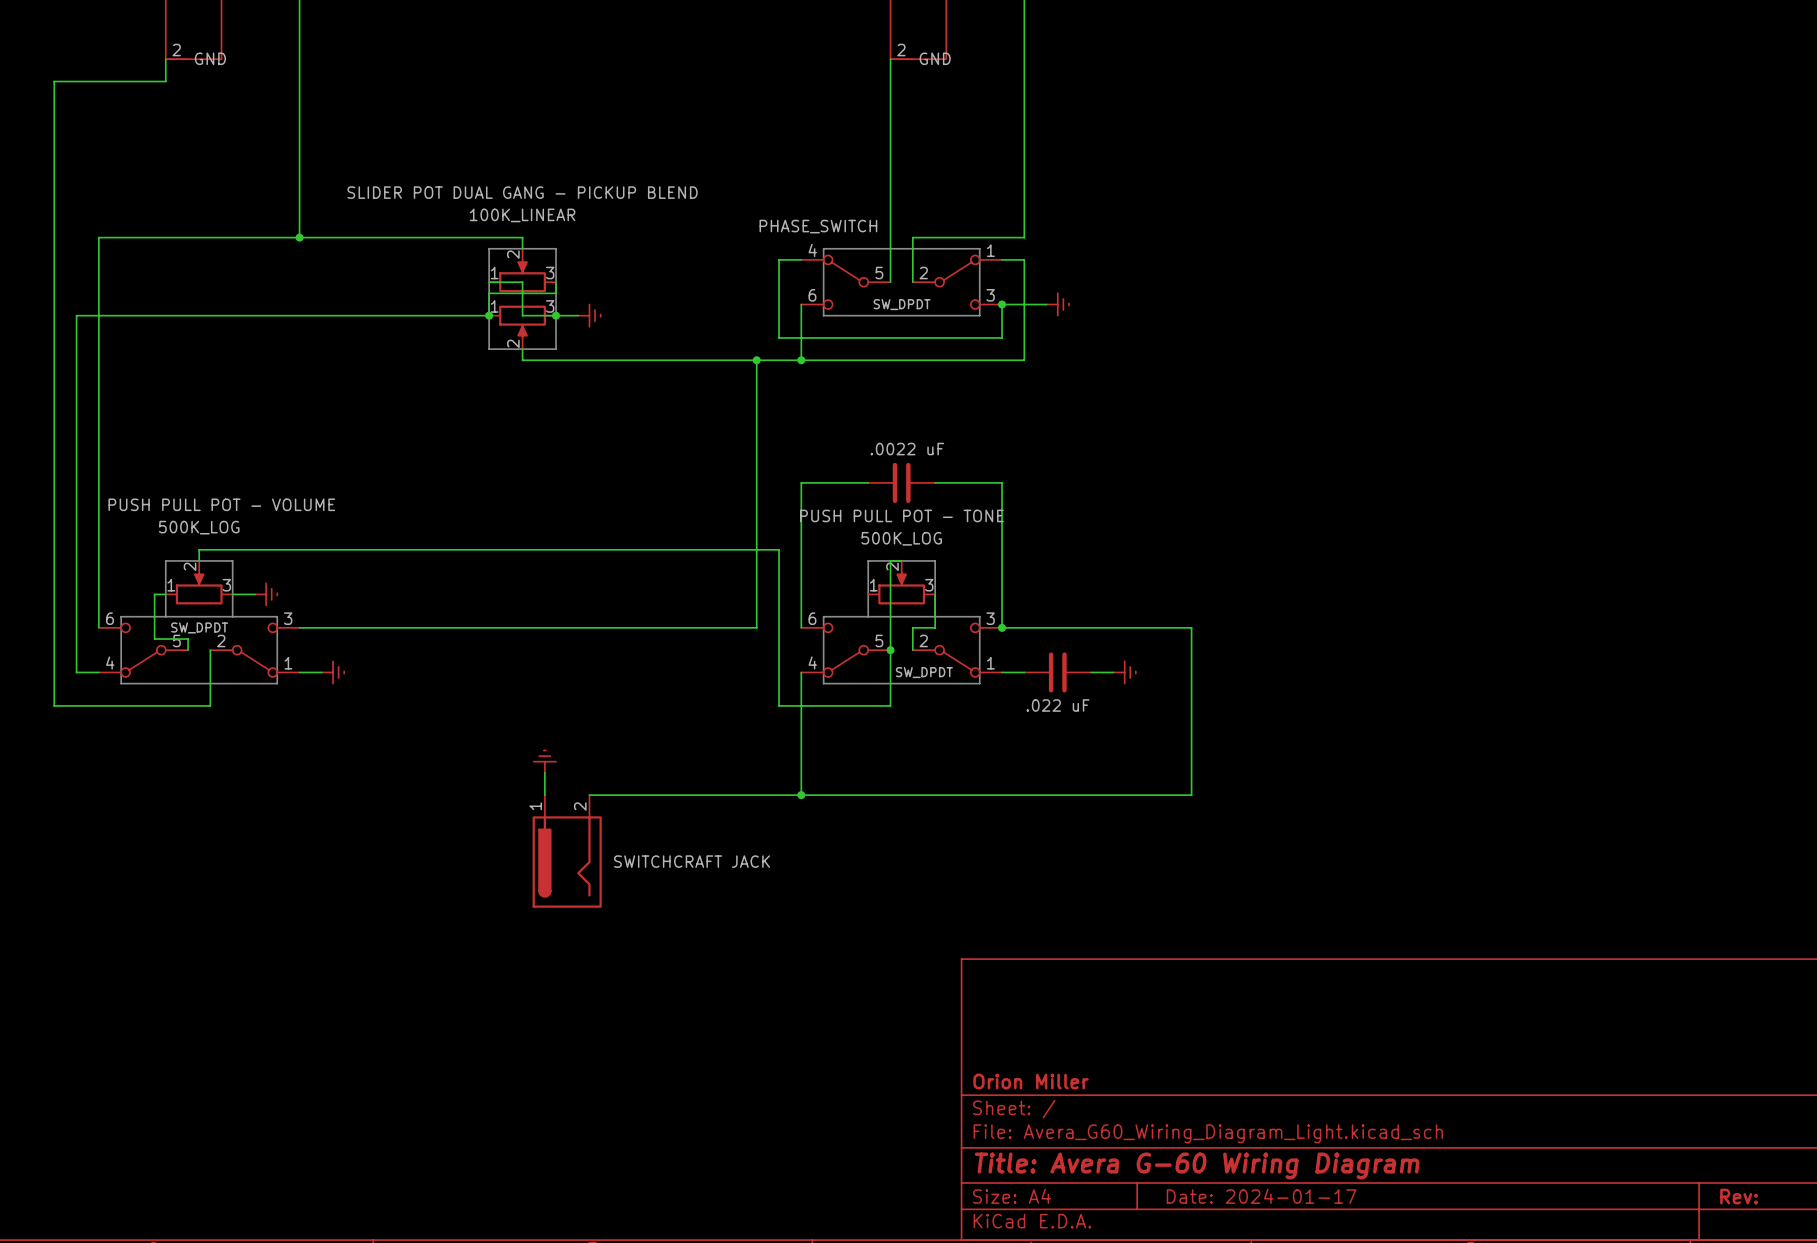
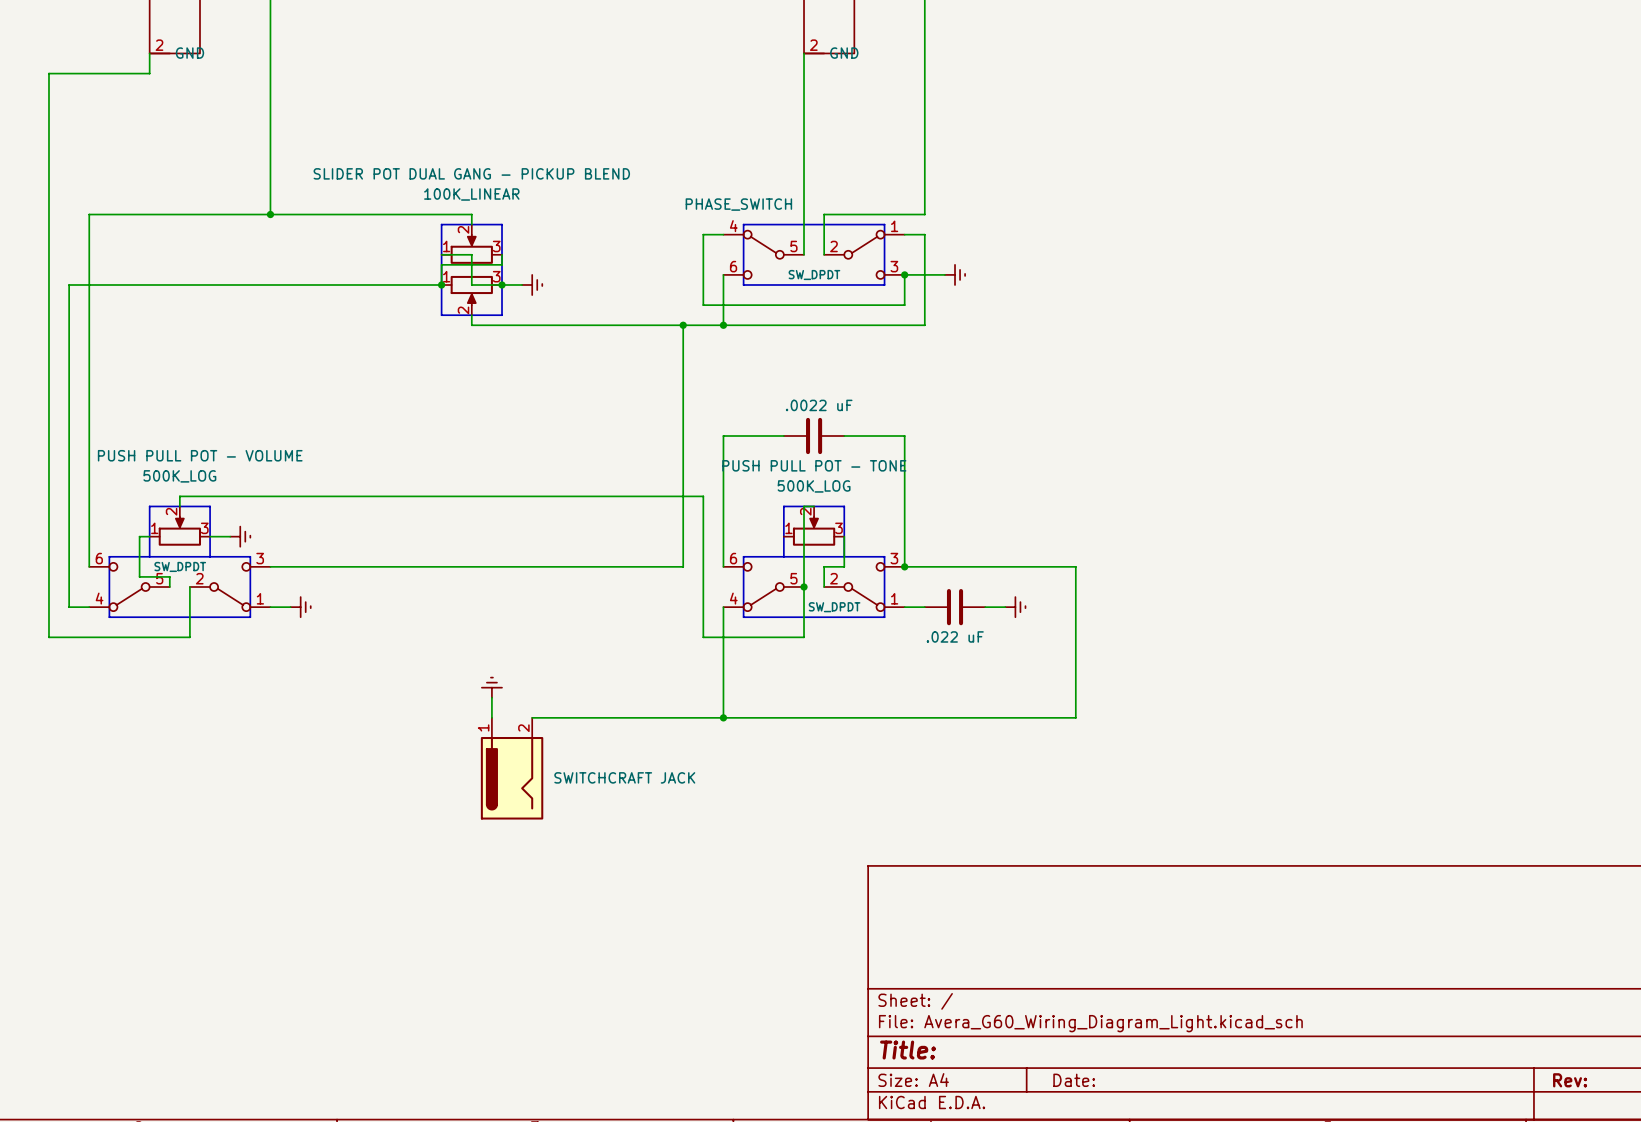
title block: Orion Miller (1031, 1081) -> none
title block: Title: Avera G-60 Wiring Diagram (1197, 1165) -> Title: (908, 1050)
title block: Date: 2024-01-17 (1261, 1196) -> Date: (1074, 1080)

